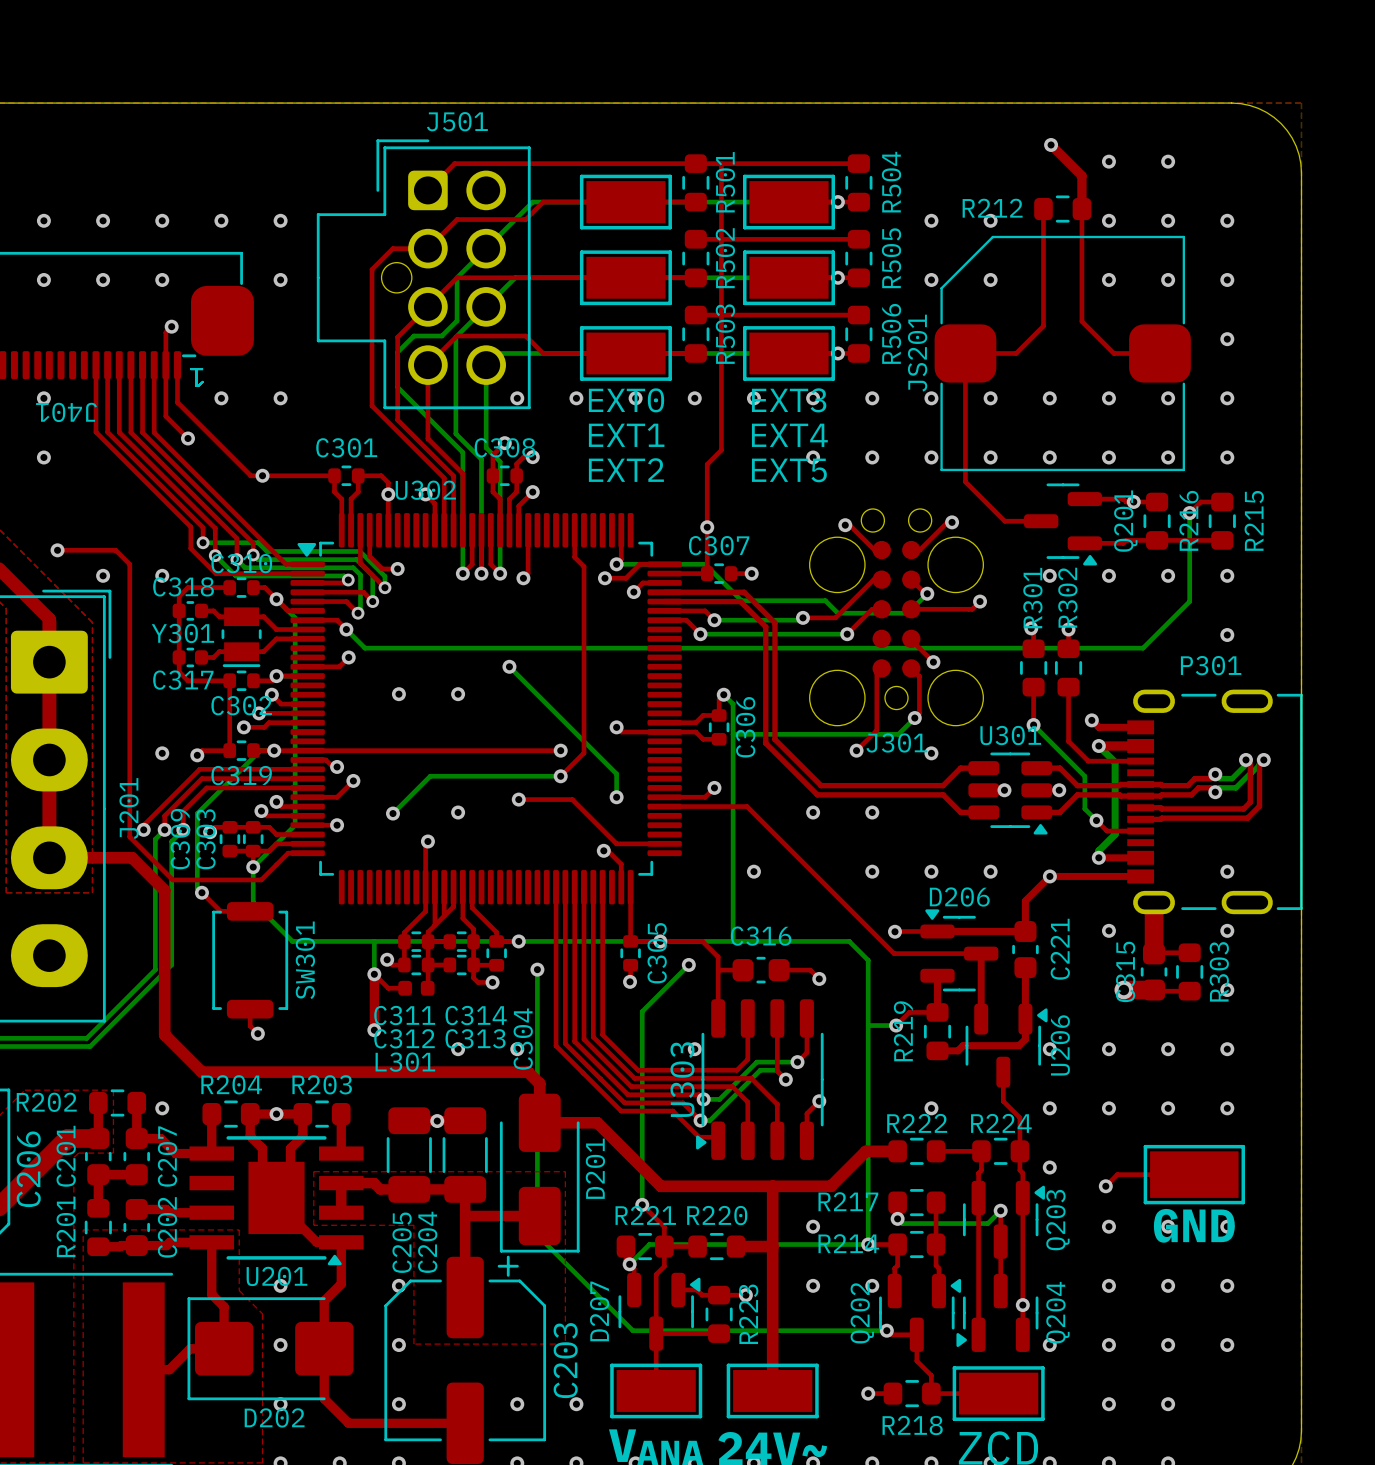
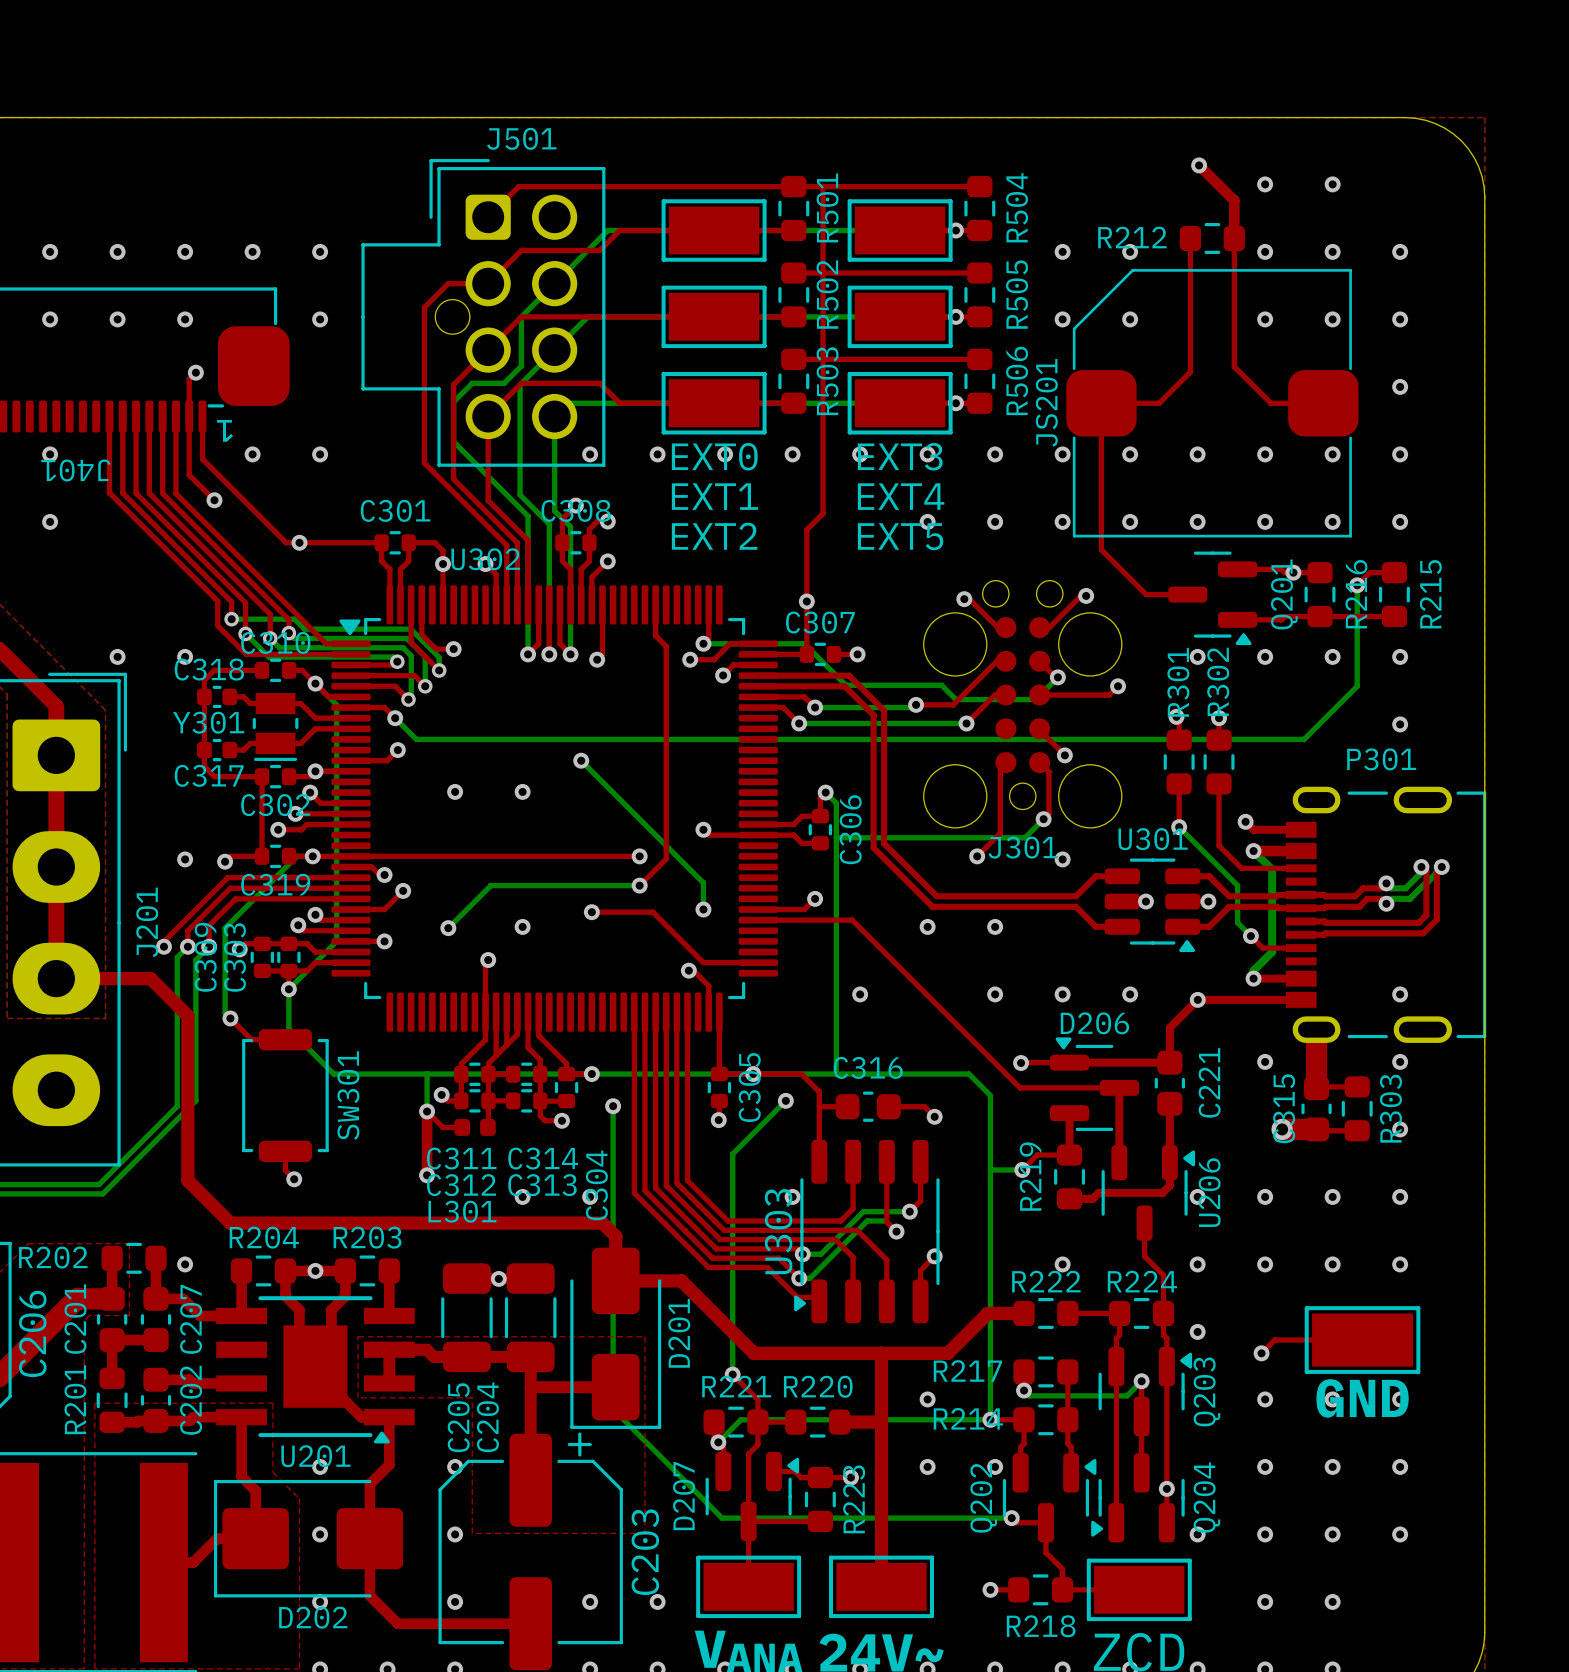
top track: (57, 550) (115, 550) (129, 564) (129, 836) (172, 879) (261, 879) (288, 853) (307, 853) -> none
via: (57, 550) -> none

